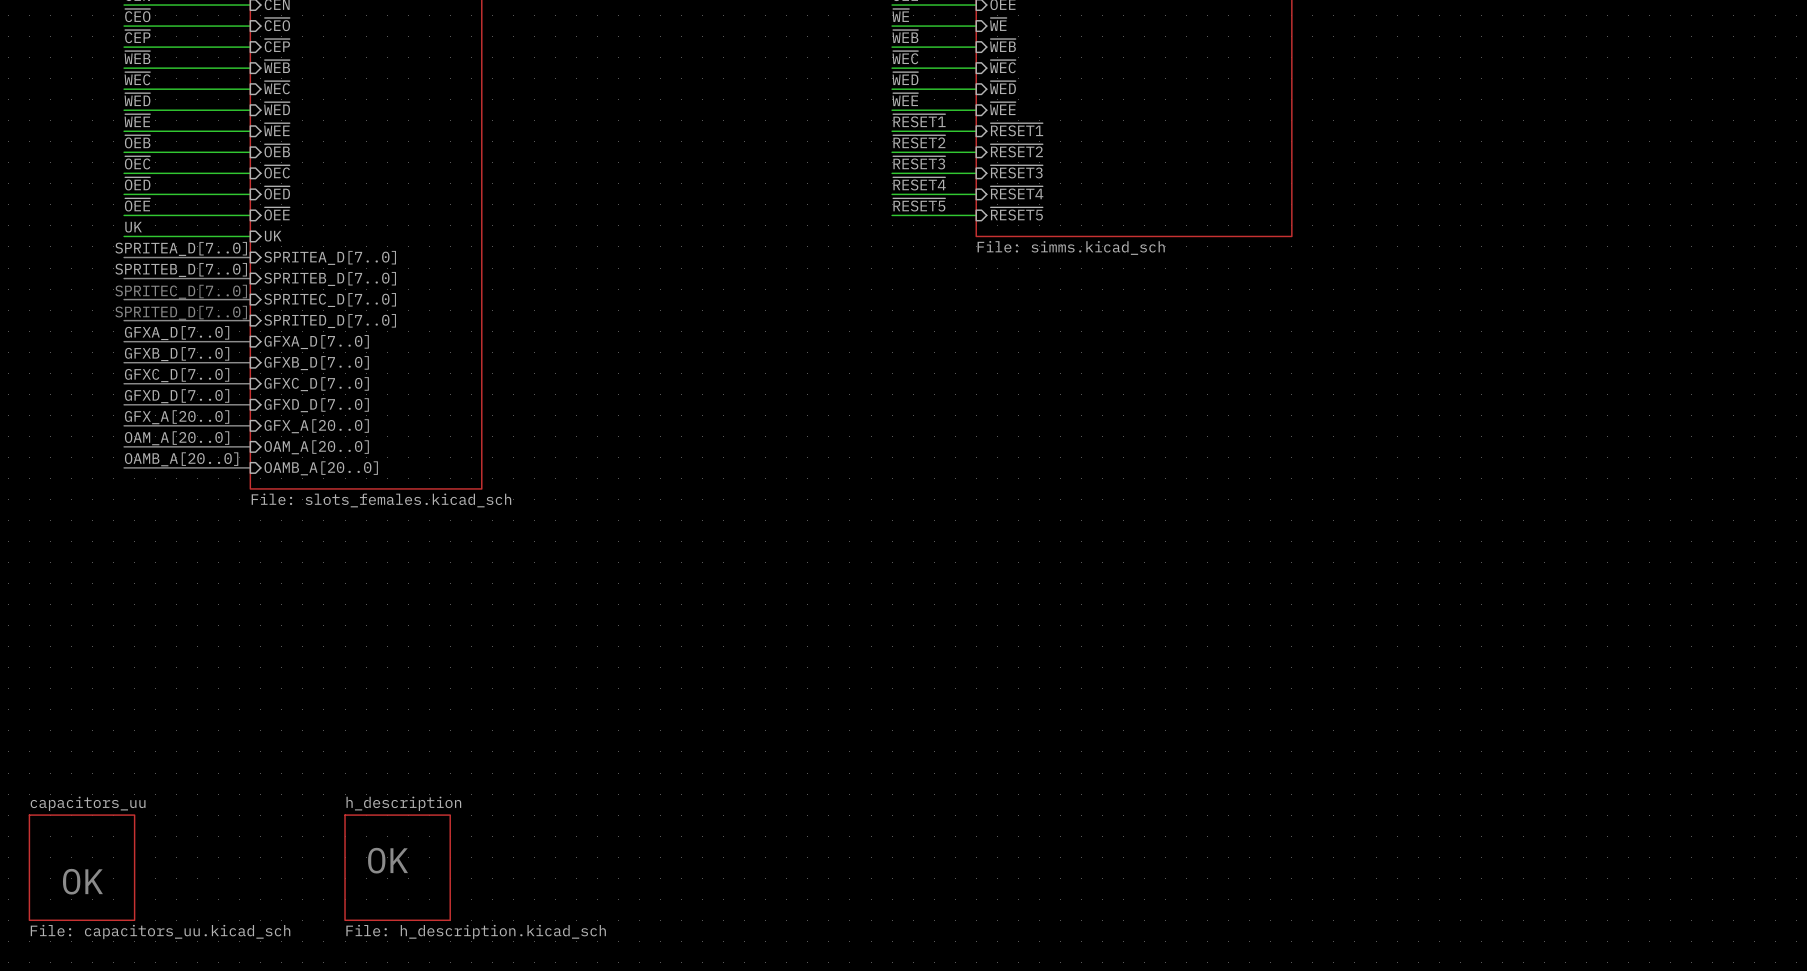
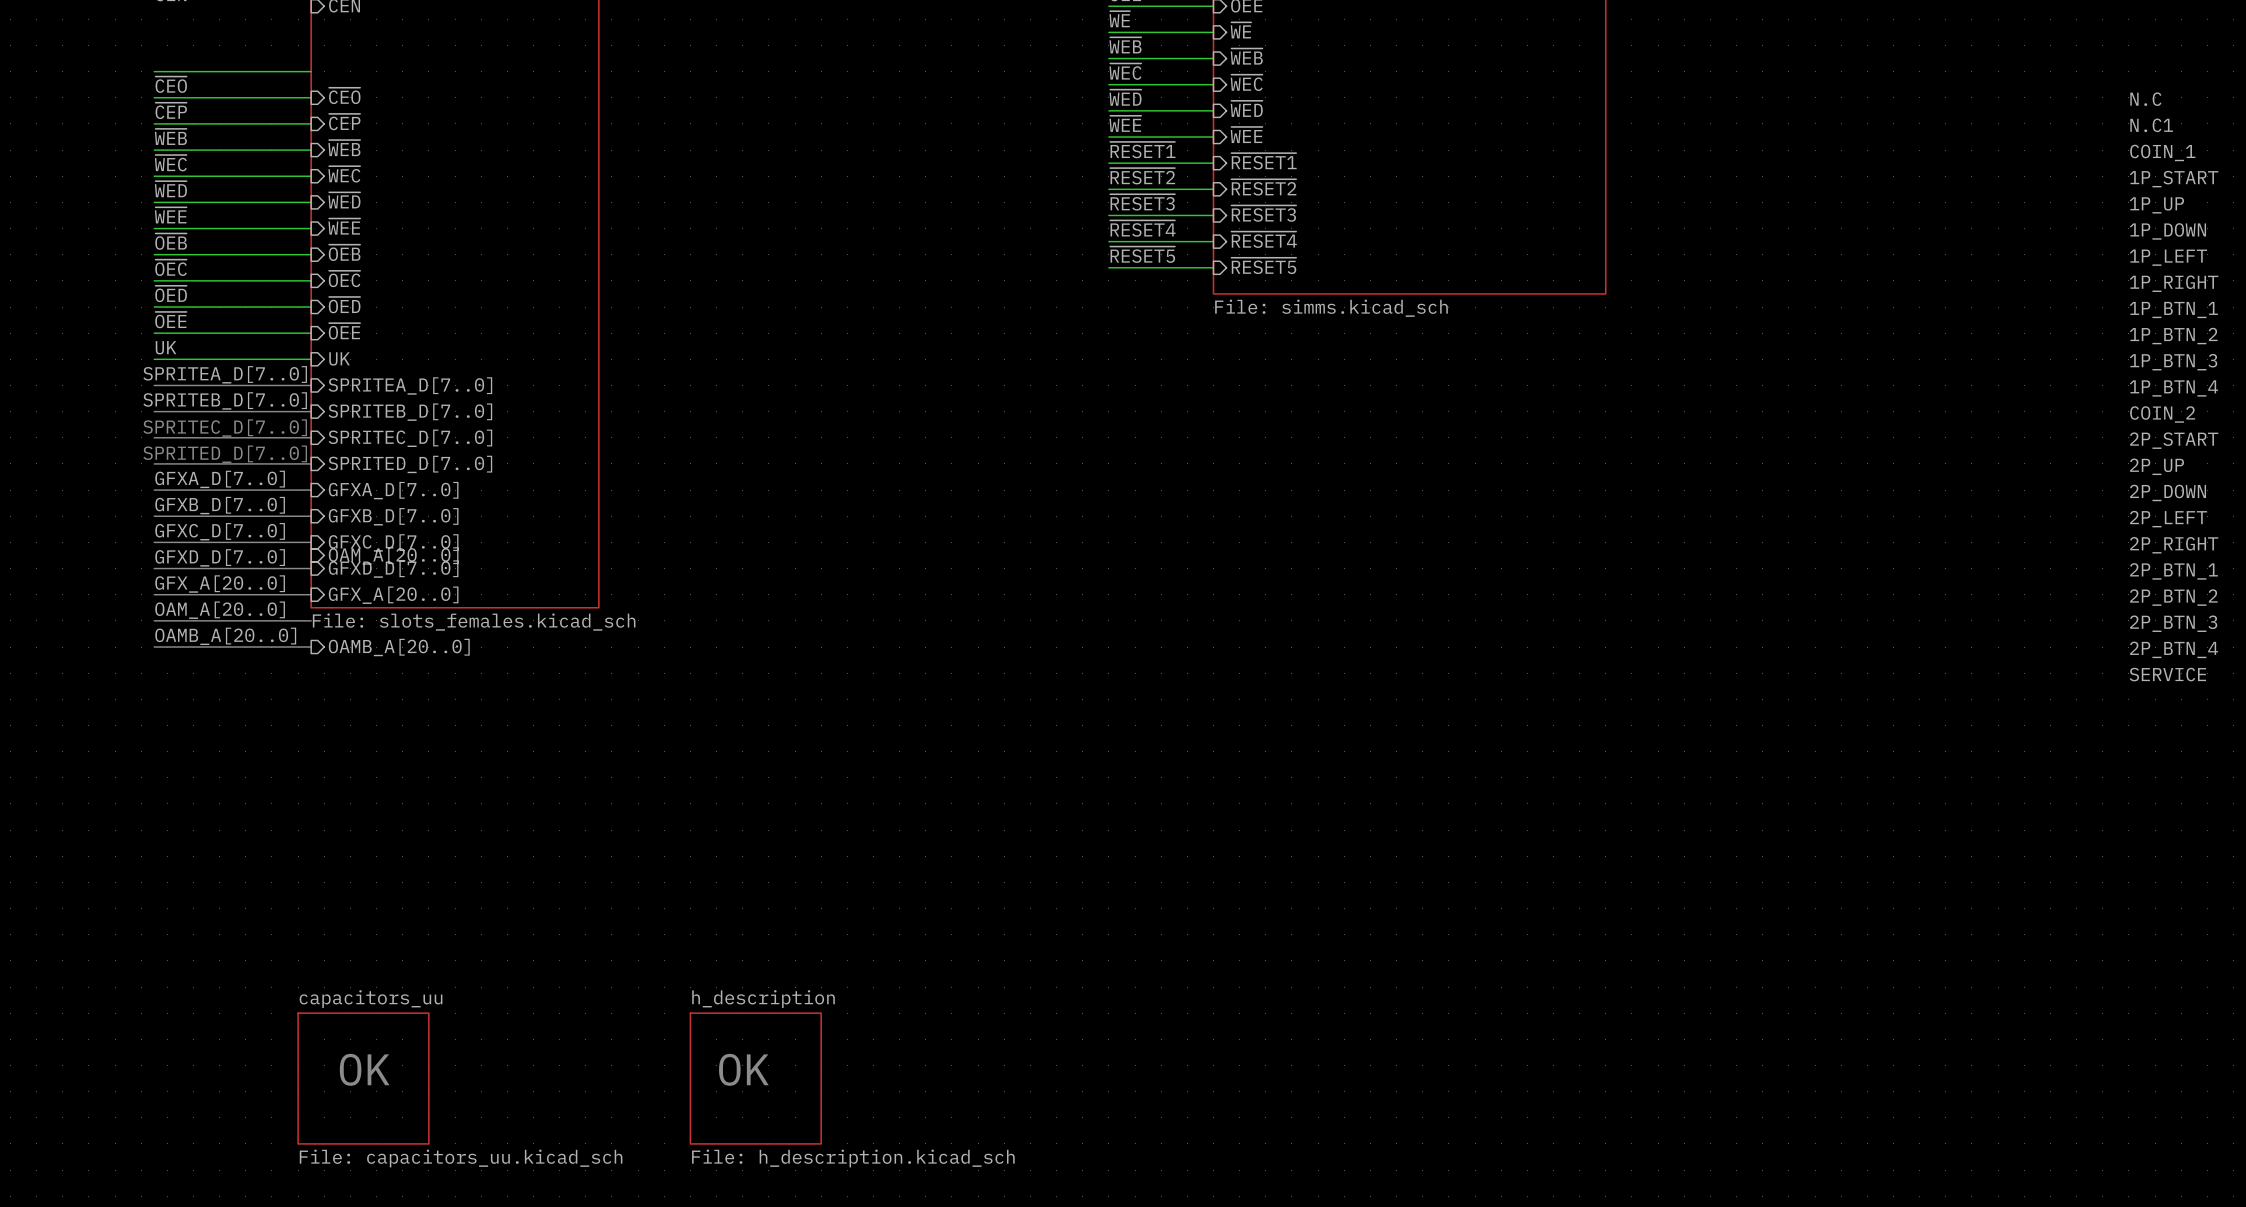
wire: (124, 5) (250, 5) -> (154, 71) (311, 71)
label position: ~{CEO} (137, 15) -> ~{CEO} (171, 84)
sheet pin position: ~{CEO} (277, 24) -> ~{CEO} (344, 95)
wire: (124, 26) (250, 26) -> (154, 97) (311, 97)
label position: ~{CEP} (137, 36) -> ~{CEP} (171, 110)
sheet pin position: ~{CEP} (277, 45) -> ~{CEP} (344, 122)
wire: (124, 47) (250, 47) -> (154, 123) (311, 123)
label position: ~{WEB} (137, 57) -> ~{WEB} (170, 136)
sheet pin position: ~{WEB} (277, 66) -> ~{WEB} (344, 148)
wire: (124, 68) (250, 68) -> (154, 150) (311, 150)
label position: ~{WEC} (137, 78) -> ~{WEC} (170, 163)
label: none -> N.C (2145, 99)
sheet pin position: ~{WEC} (277, 87) -> ~{WEC} (344, 174)
wire: (124, 89) (250, 89) -> (154, 176) (311, 176)
label position: ~{WED} (137, 99) -> ~{WED} (170, 189)
label: none -> N.C1 (2151, 125)
sheet pin position: ~{WED} (277, 108) -> ~{WED} (344, 200)
wire: (124, 110) (250, 110) -> (154, 202) (311, 202)
label position: ~{WEE} (137, 120) -> ~{WEE} (170, 215)
label: none -> COIN_1 (2162, 152)
sheet pin position: ~{WEE} (277, 129) -> ~{WEE} (344, 226)
wire: (124, 131) (250, 131) -> (154, 228) (311, 228)
label position: ~{OEB} (137, 141) -> ~{OEB} (171, 241)
label: none -> 1P_START (2174, 179)
sheet pin position: ~{OEB} (277, 150) -> ~{OEB} (344, 252)
wire: (124, 152) (250, 152) -> (154, 254) (311, 254)
label position: ~{OEC} (137, 162) -> ~{OEC} (171, 267)
label: none -> 1P_UP (2156, 205)
sheet pin position: ~{OEC} (277, 171) -> ~{OEC} (344, 278)
wire: (124, 173) (250, 173) -> (154, 280) (311, 280)
label position: ~{OED} (137, 183) -> ~{OED} (171, 293)
label: none -> 1P_DOWN (2167, 231)
sheet pin position: ~{OED} (277, 192) -> ~{OED} (344, 305)
wire: (124, 194) (250, 194) -> (154, 307) (311, 307)
label position: ~{OEE} (137, 204) -> ~{OEE} (170, 320)
label: none -> 1P_LEFT (2168, 257)
sheet pin position: ~{OEE} (277, 213) -> ~{OEE} (344, 331)
wire: (124, 215) (250, 215) -> (154, 333) (311, 333)
label position: UK (133, 227) -> UK (166, 347)
label: none -> 1P_RIGHT (2174, 283)
wire: (124, 236) (250, 236) -> (154, 359) (311, 359)
sheet pin position: UK (273, 236) -> UK (339, 358)
label position: SPRITEA_D[7..0] (181, 248) -> SPRITEA_D[7..0] (225, 374)
label: none -> 1P_BTN_1 (2173, 310)
bus: (124, 257) (250, 257) -> (154, 385) (311, 385)
sheet pin position: SPRITEA_D[7..0] (330, 257) -> SPRITEA_D[7..0] (410, 385)
label position: SPRITEB_D[7..0] (181, 269) -> SPRITEB_D[7..0] (225, 400)
label: none -> 1P_BTN_2 (2173, 336)
bus: (124, 278) (250, 278) -> (154, 411) (311, 411)
sheet pin position: SPRITEB_D[7..0] (330, 278) -> SPRITEB_D[7..0] (410, 412)
text position: SPRITEC_D[7..0] (181, 291) -> SPRITEC_D[7..0] (225, 428)
label: none -> 1P_BTN_3 (2173, 362)
bus: (124, 299) (250, 299) -> (154, 437) (311, 437)
sheet pin position: SPRITEC_D[7..0] (330, 300) -> SPRITEC_D[7..0] (410, 438)
text position: SPRITED_D[7..0] (181, 312) -> SPRITED_D[7..0] (225, 454)
label: none -> 1P_BTN_4 (2173, 388)
bus: (124, 320) (250, 320) -> (154, 463) (311, 463)
sheet pin position: SPRITED_D[7..0] (330, 321) -> SPRITED_D[7..0] (410, 464)
label position: GFXA_D[7..0] (177, 333) -> GFXA_D[7..0] (220, 479)
label: none -> COIN_2 (2162, 414)
bus: (124, 341) (250, 341) -> (154, 490) (311, 490)
sheet pin position: GFXA_D[7..0] (316, 342) -> GFXA_D[7..0] (393, 490)
label position: GFXB_D[7..0] (177, 354) -> GFXB_D[7..0] (220, 505)
label: none -> 2P_START (2174, 440)
bus: (124, 362) (250, 362) -> (154, 516) (311, 516)
sheet pin position: GFXB_D[7..0] (316, 363) -> GFXB_D[7..0] (393, 516)
label position: GFXC_D[7..0] (177, 375) -> GFXC_D[7..0] (220, 531)
label: none -> 2P_UP (2157, 466)
bus: (124, 383) (250, 383) -> (154, 542) (311, 542)
sheet pin position: GFXC_D[7..0] (316, 384) -> GFXC_D[7..0] (393, 542)
label position: GFXD_D[7..0] (177, 396) -> GFXD_D[7..0] (220, 557)
label: none -> 2P_DOWN (2168, 492)
bus: (124, 404) (250, 404) -> (154, 568) (311, 568)
sheet pin position: GFXD_D[7..0] (316, 405) -> GFXD_D[7..0] (393, 569)
label position: GFX_A[20..0] (177, 417) -> GFX_A[20..0] (220, 584)
label: none -> 2P_LEFT (2168, 519)
bus: (124, 425) (250, 425) -> (154, 594) (311, 594)
sheet pin position: GFX_A[20..0] (316, 426) -> GFX_A[20..0] (393, 595)
label position: OAM_A[20..0] (177, 438) -> OAM_A[20..0] (220, 610)
label: none -> 2P_RIGHT (2174, 545)
bus: (124, 446) (250, 446) -> (154, 620) (311, 620)
label position: OAMB_A[20..0] (181, 459) -> OAMB_A[20..0] (225, 636)
label: none -> 2P_BTN_1 (2173, 571)
bus: (124, 467) (250, 467) -> (154, 647) (311, 647)
sheet pin position: OAMB_A[20..0] (321, 468) -> OAMB_A[20..0] (399, 647)
label: none -> 2P_BTN_2 (2173, 597)
label: none -> 2P_BTN_3 (2173, 623)
label: none -> 2P_BTN_4 (2174, 649)
label: none -> SERVICE (2167, 674)
text position: OK (388, 860) -> OK (364, 1069)
text: none -> OK (743, 1069)
sheet capacitors_uu: File: capacitors_uu.kicad_sch (82, 867) -> none
sheet capacitors_uu: none -> File: capacitors_uu.kicad_sch (363, 1078)
sheet h_description: File: h_description.kicad_sch (397, 867) -> none
sheet h_description: none -> File: h_description.kicad_sch (755, 1078)
text: OK (82, 881) -> none

